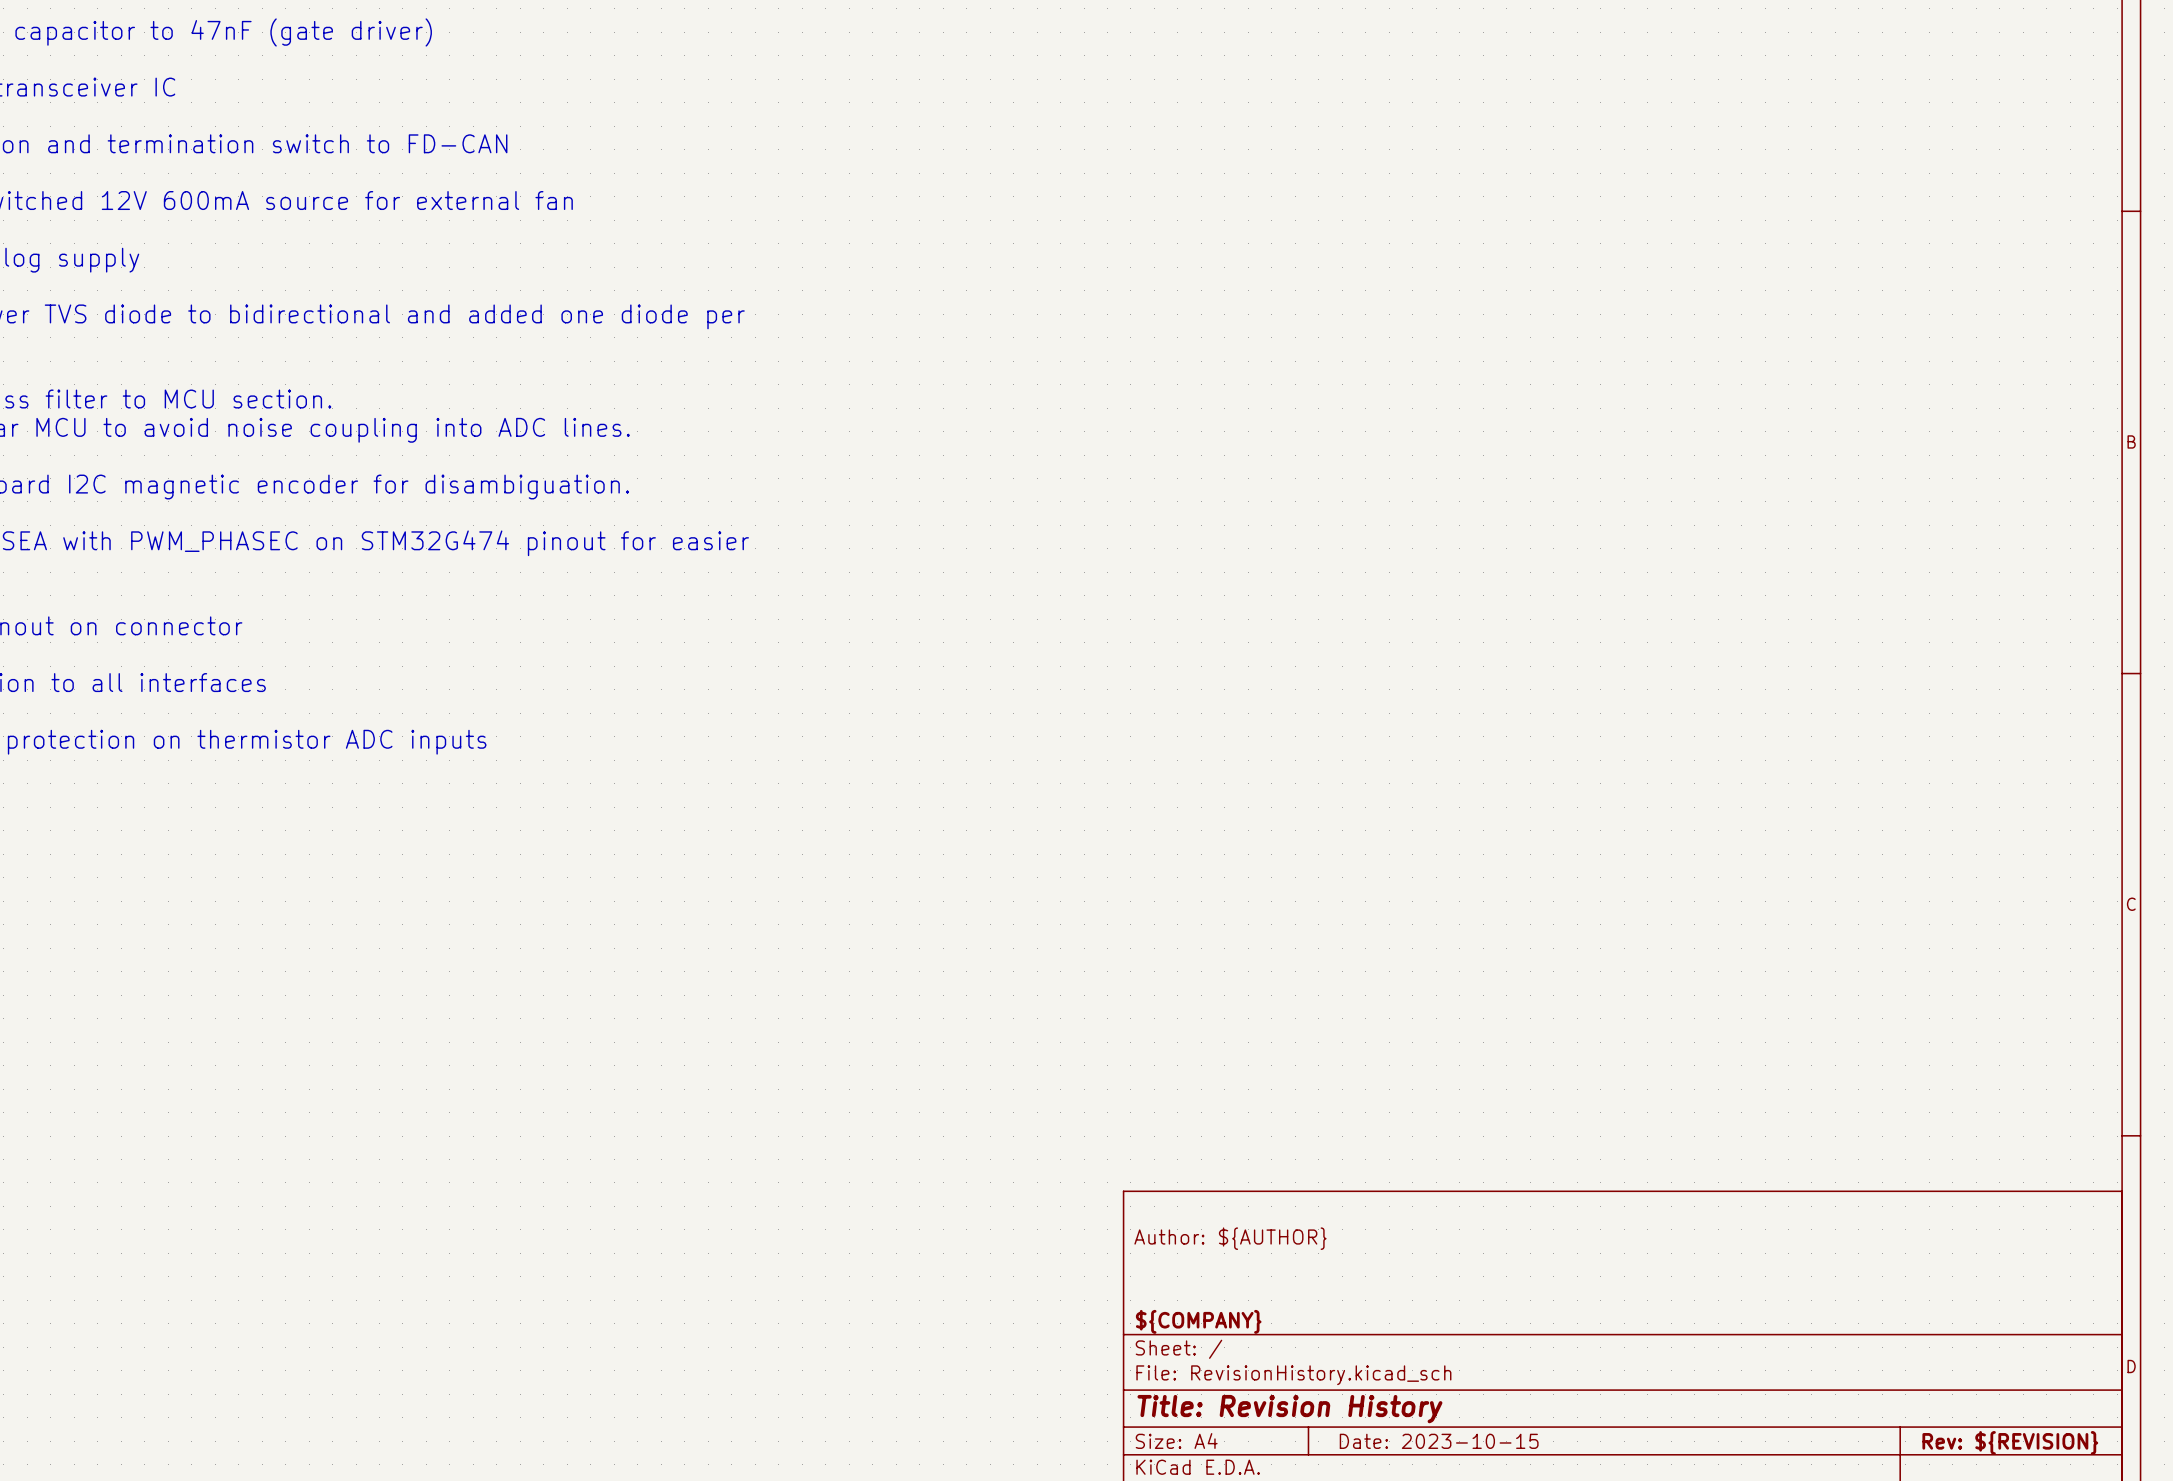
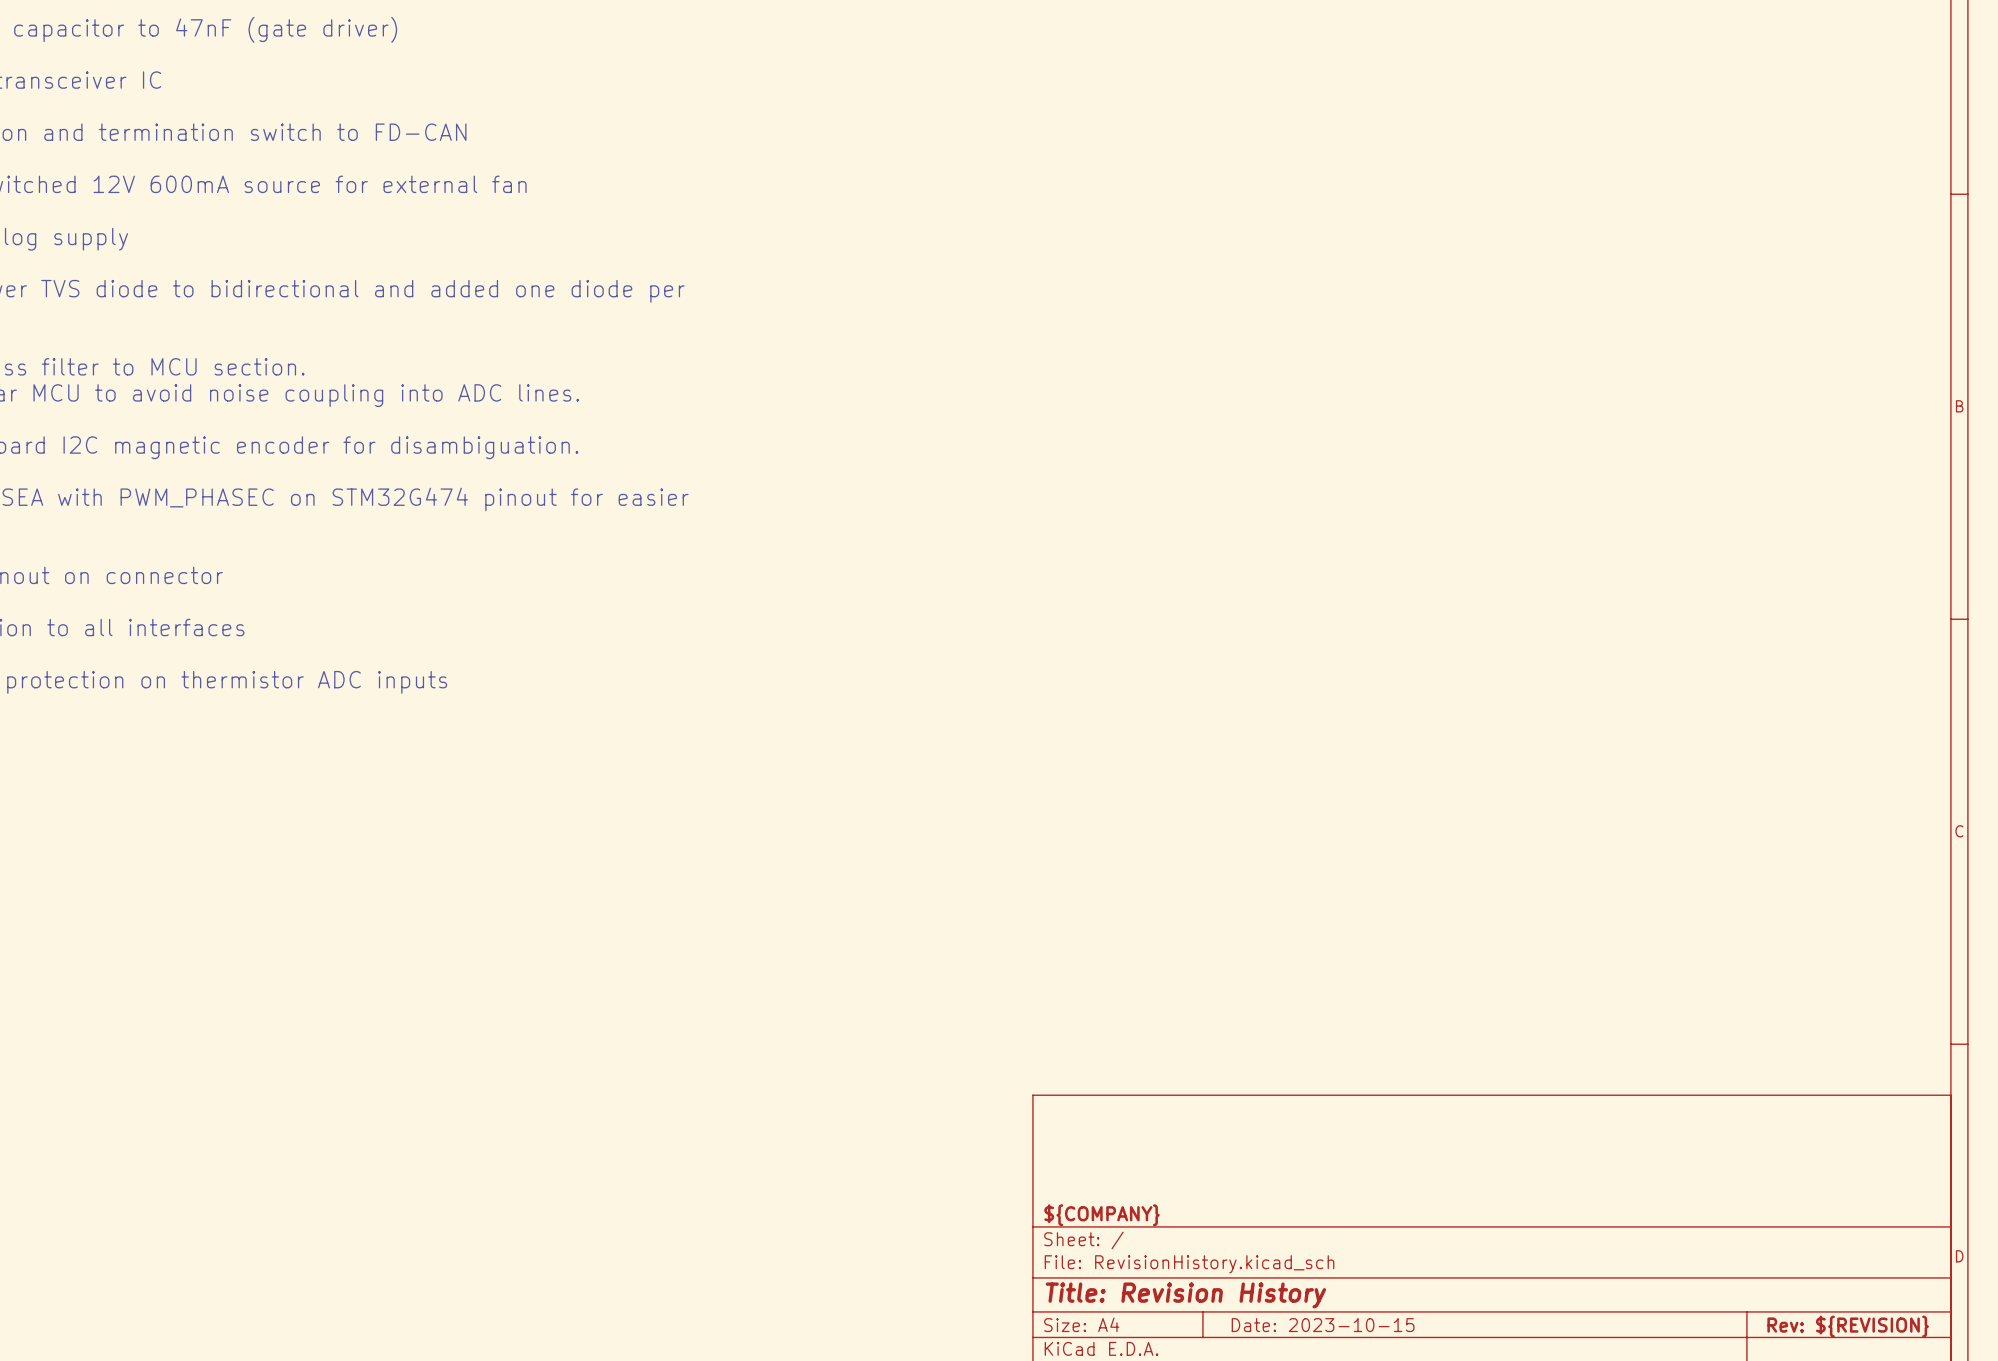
title block: Author: ${AUTHOR} (1230, 1238) -> none

